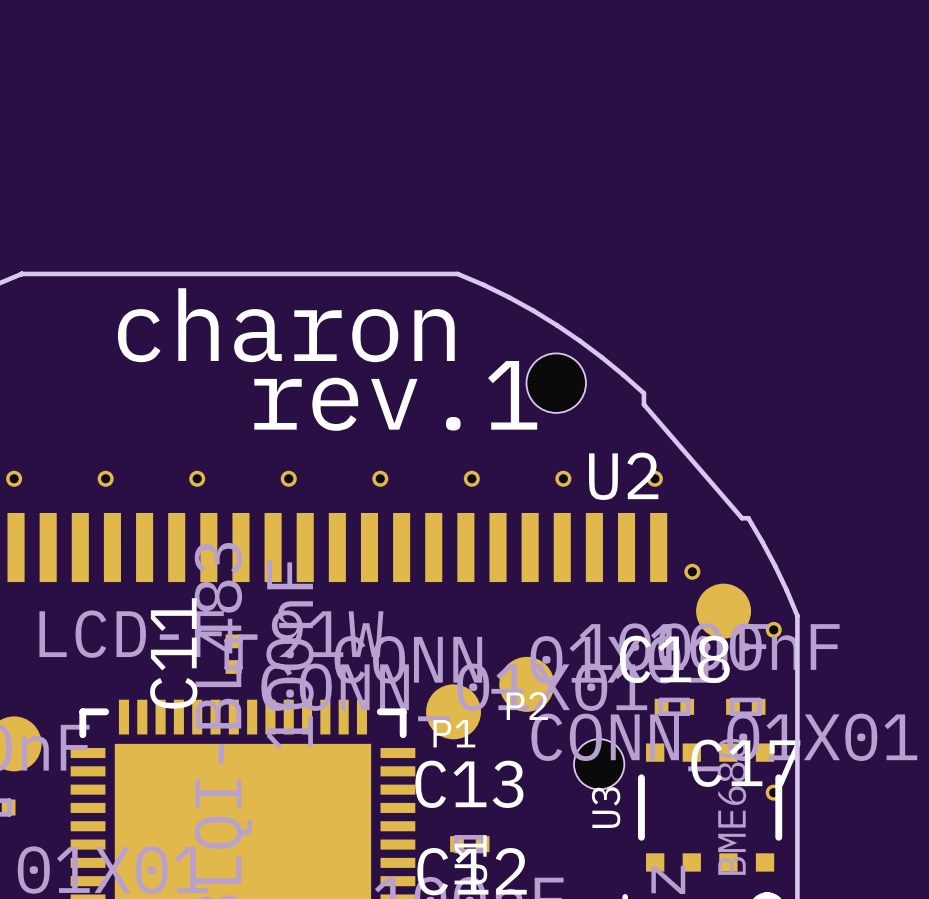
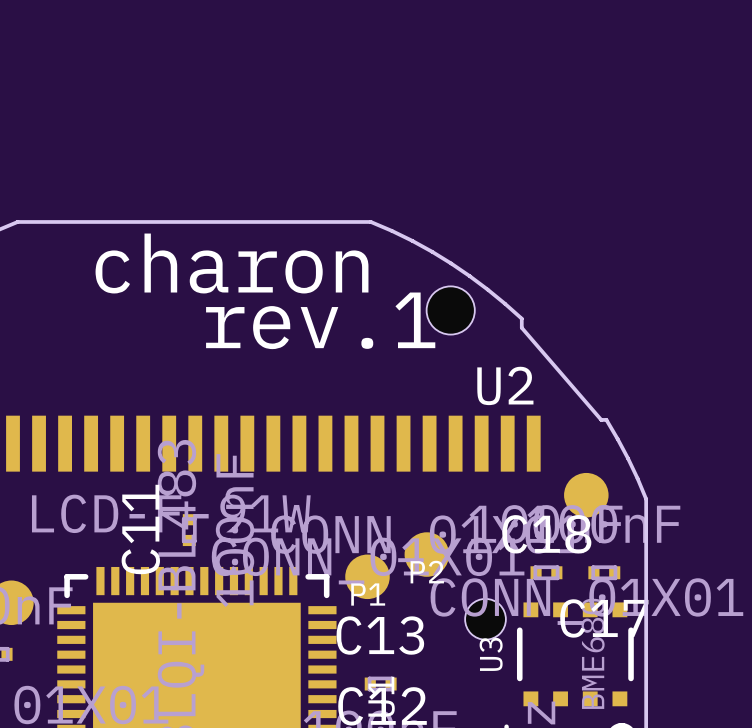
part: (14, 478) -> none
part: (105, 478) -> none
part: (197, 478) -> none
part: (288, 478) -> none
part: (380, 478) -> none
part: (471, 478) -> none
part: (563, 478) -> none
part: (654, 478) -> none
part: (692, 571) -> none
part: (773, 629) -> none
part: (773, 792) -> none

